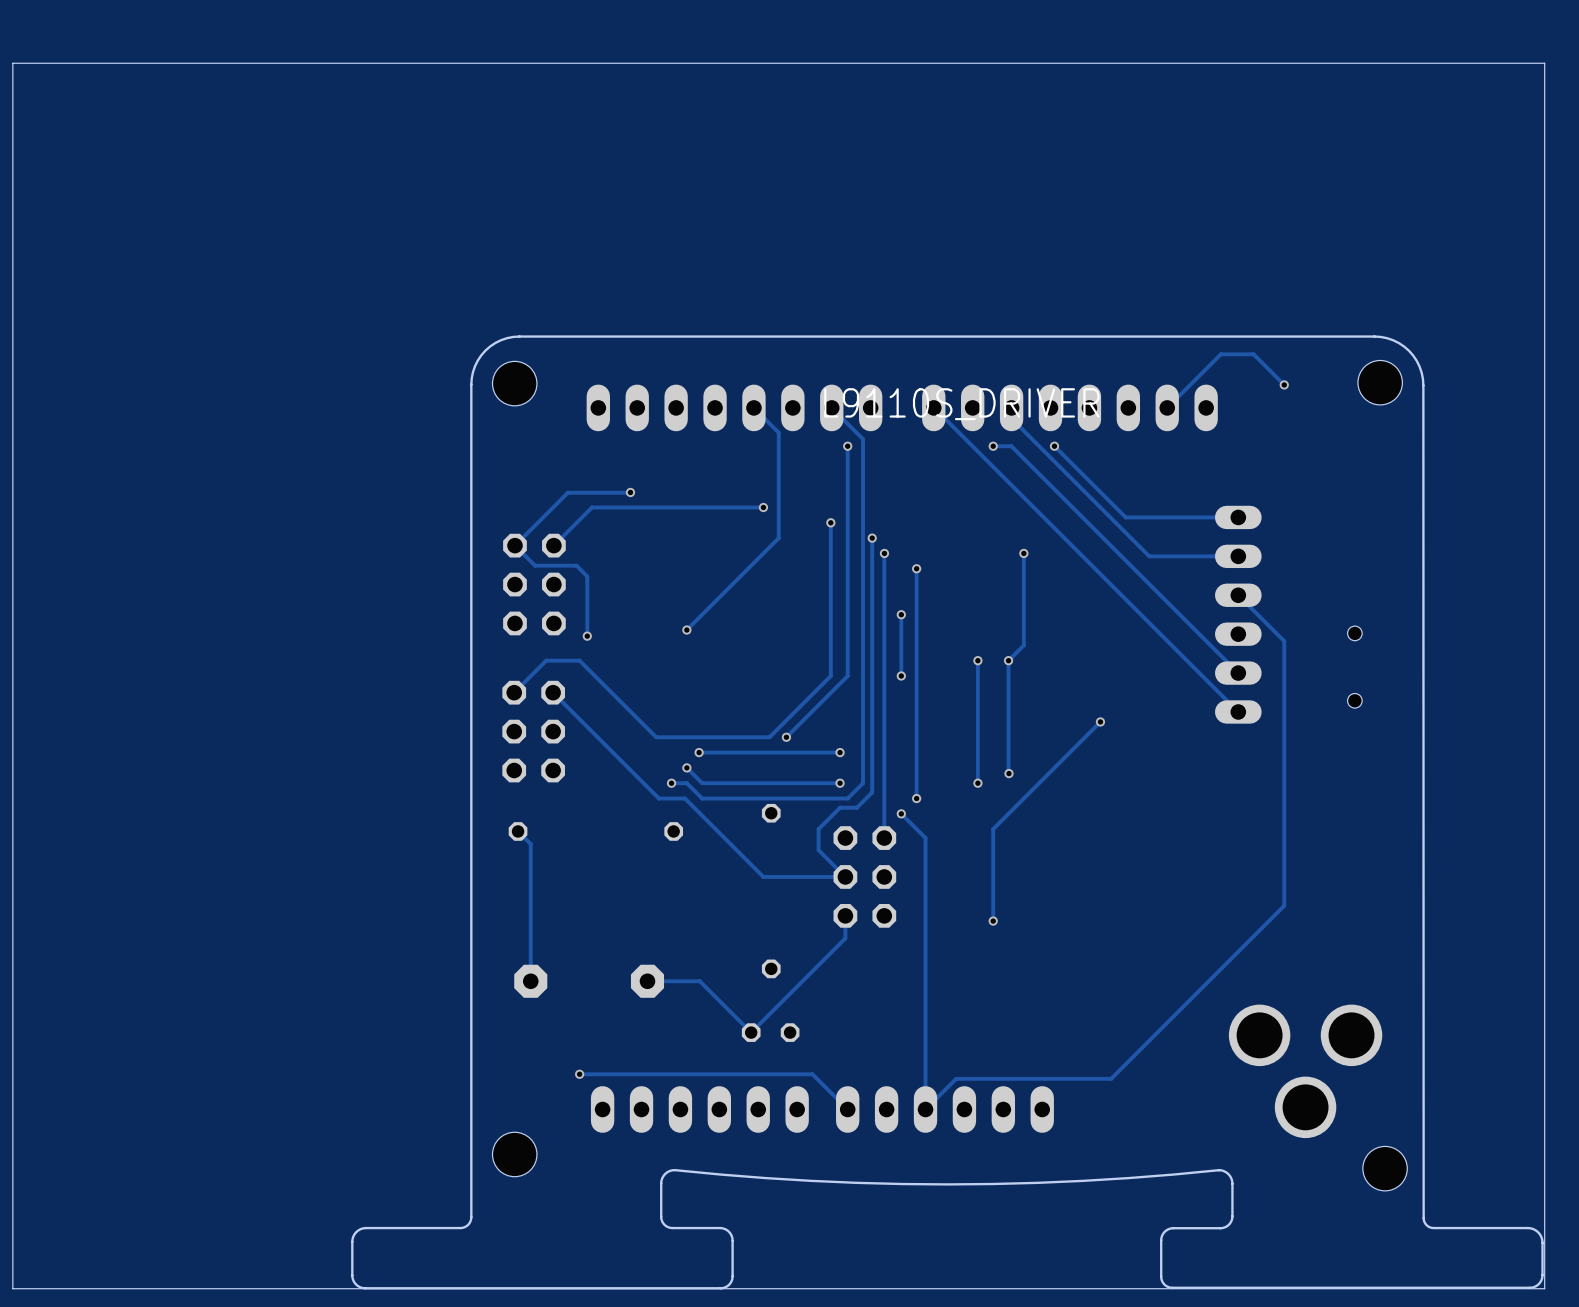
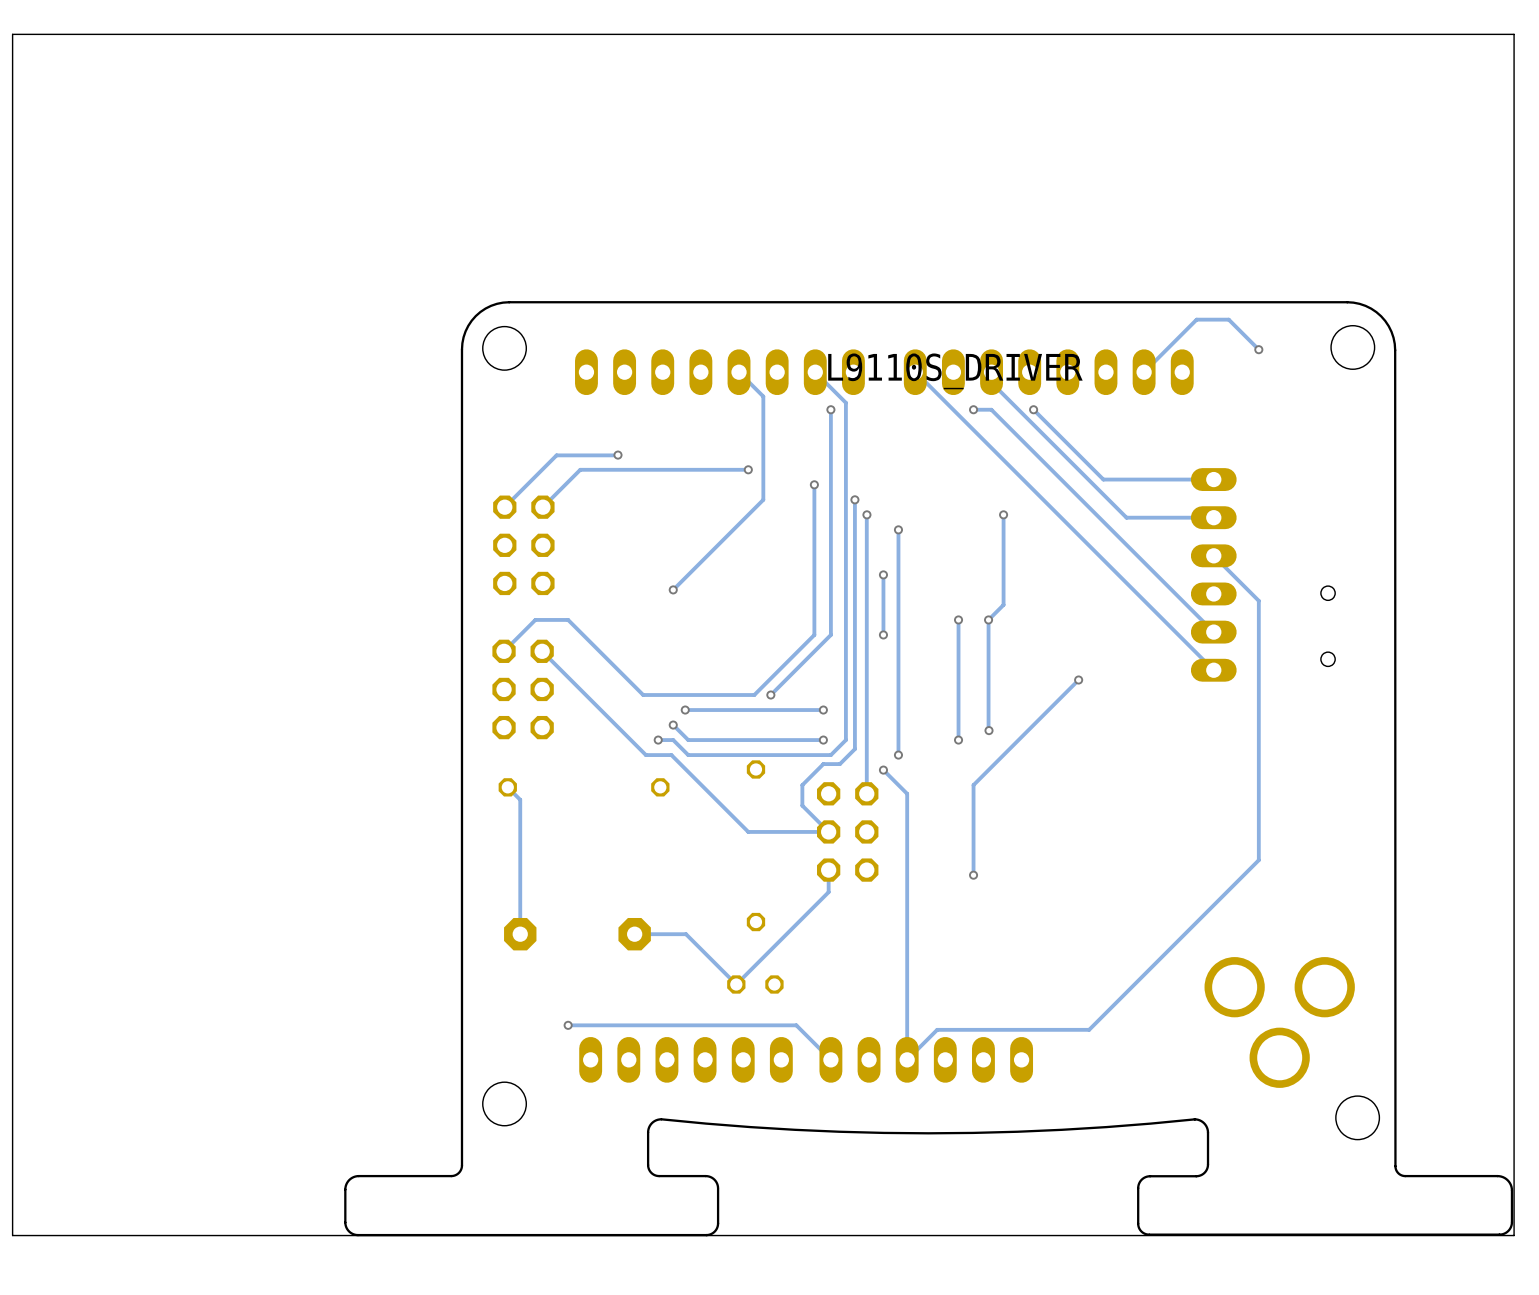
track: (514, 545) (535, 565) (576, 565) (587, 576) (587, 636) -> none
via: (587, 636) -> none

